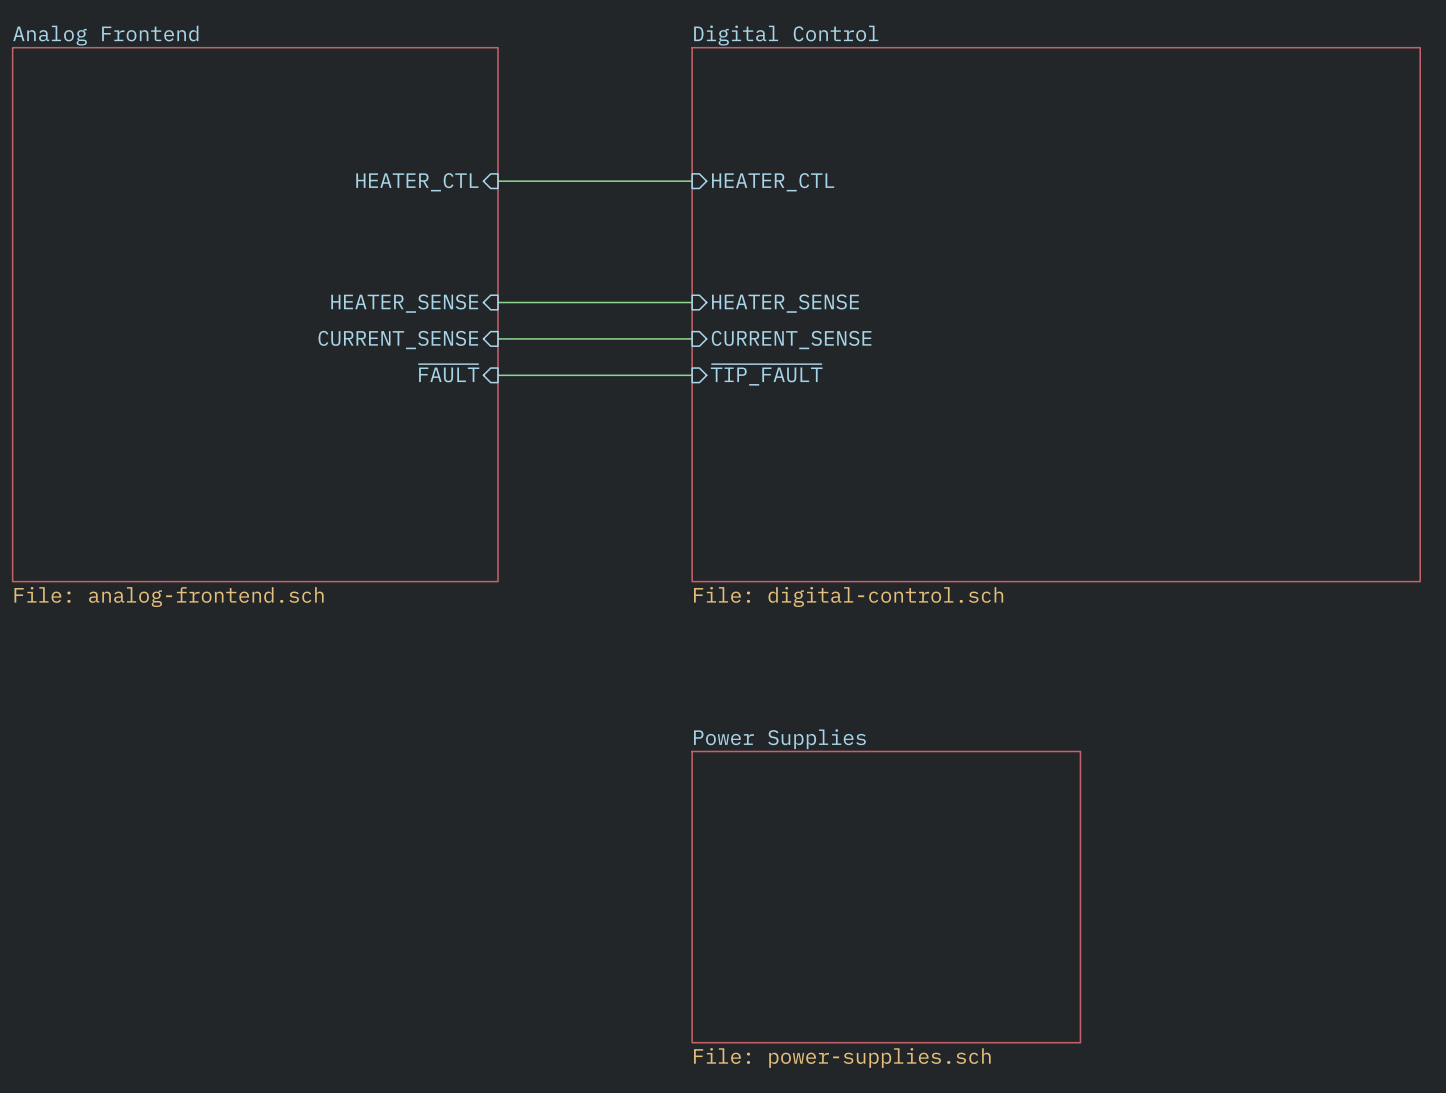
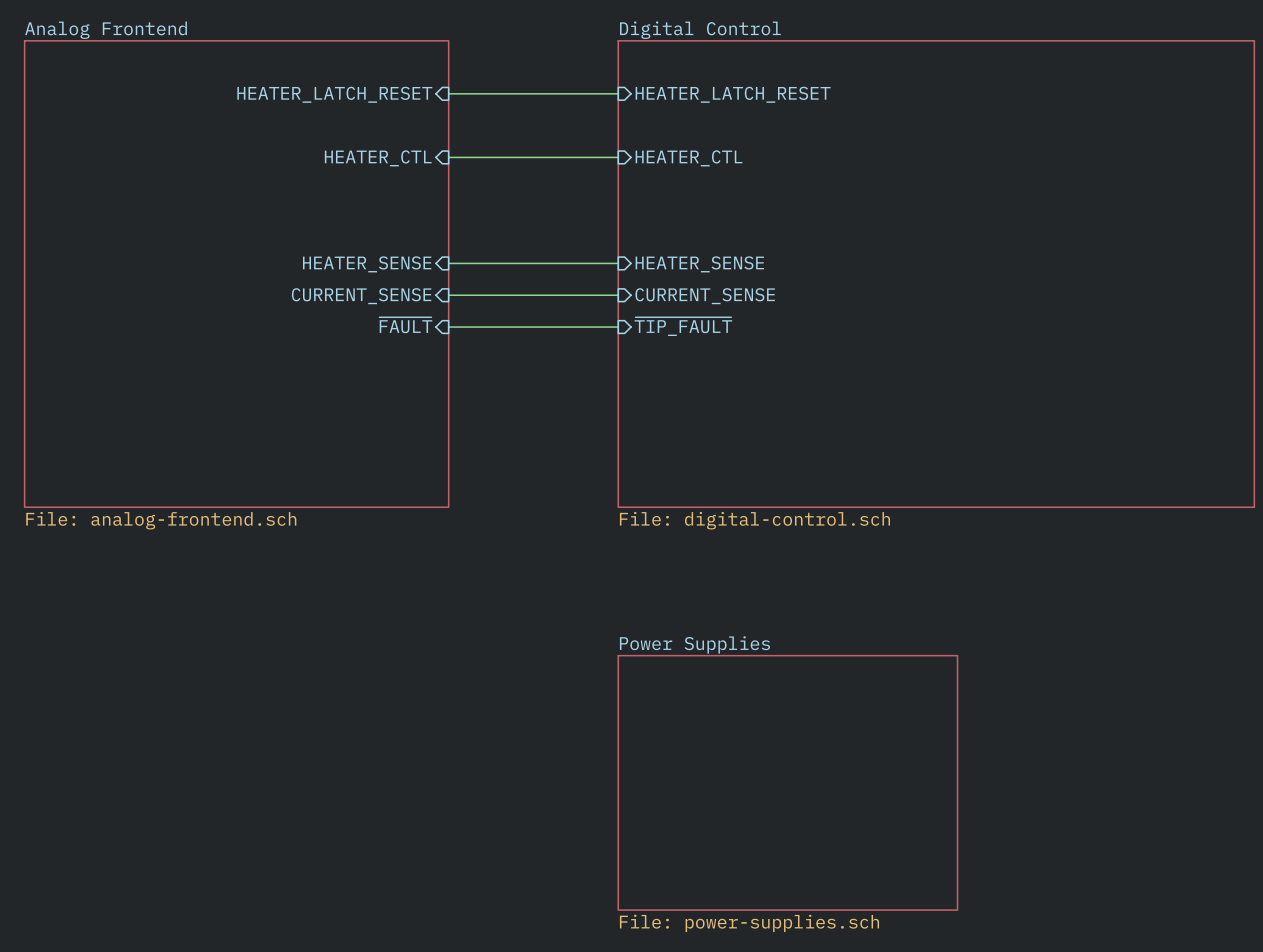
wire: none -> (448, 93) (618, 93)
sheet pin: none -> HEATER_LATCH_RESET (334, 94)
sheet pin: none -> HEATER_LATCH_RESET (733, 94)

